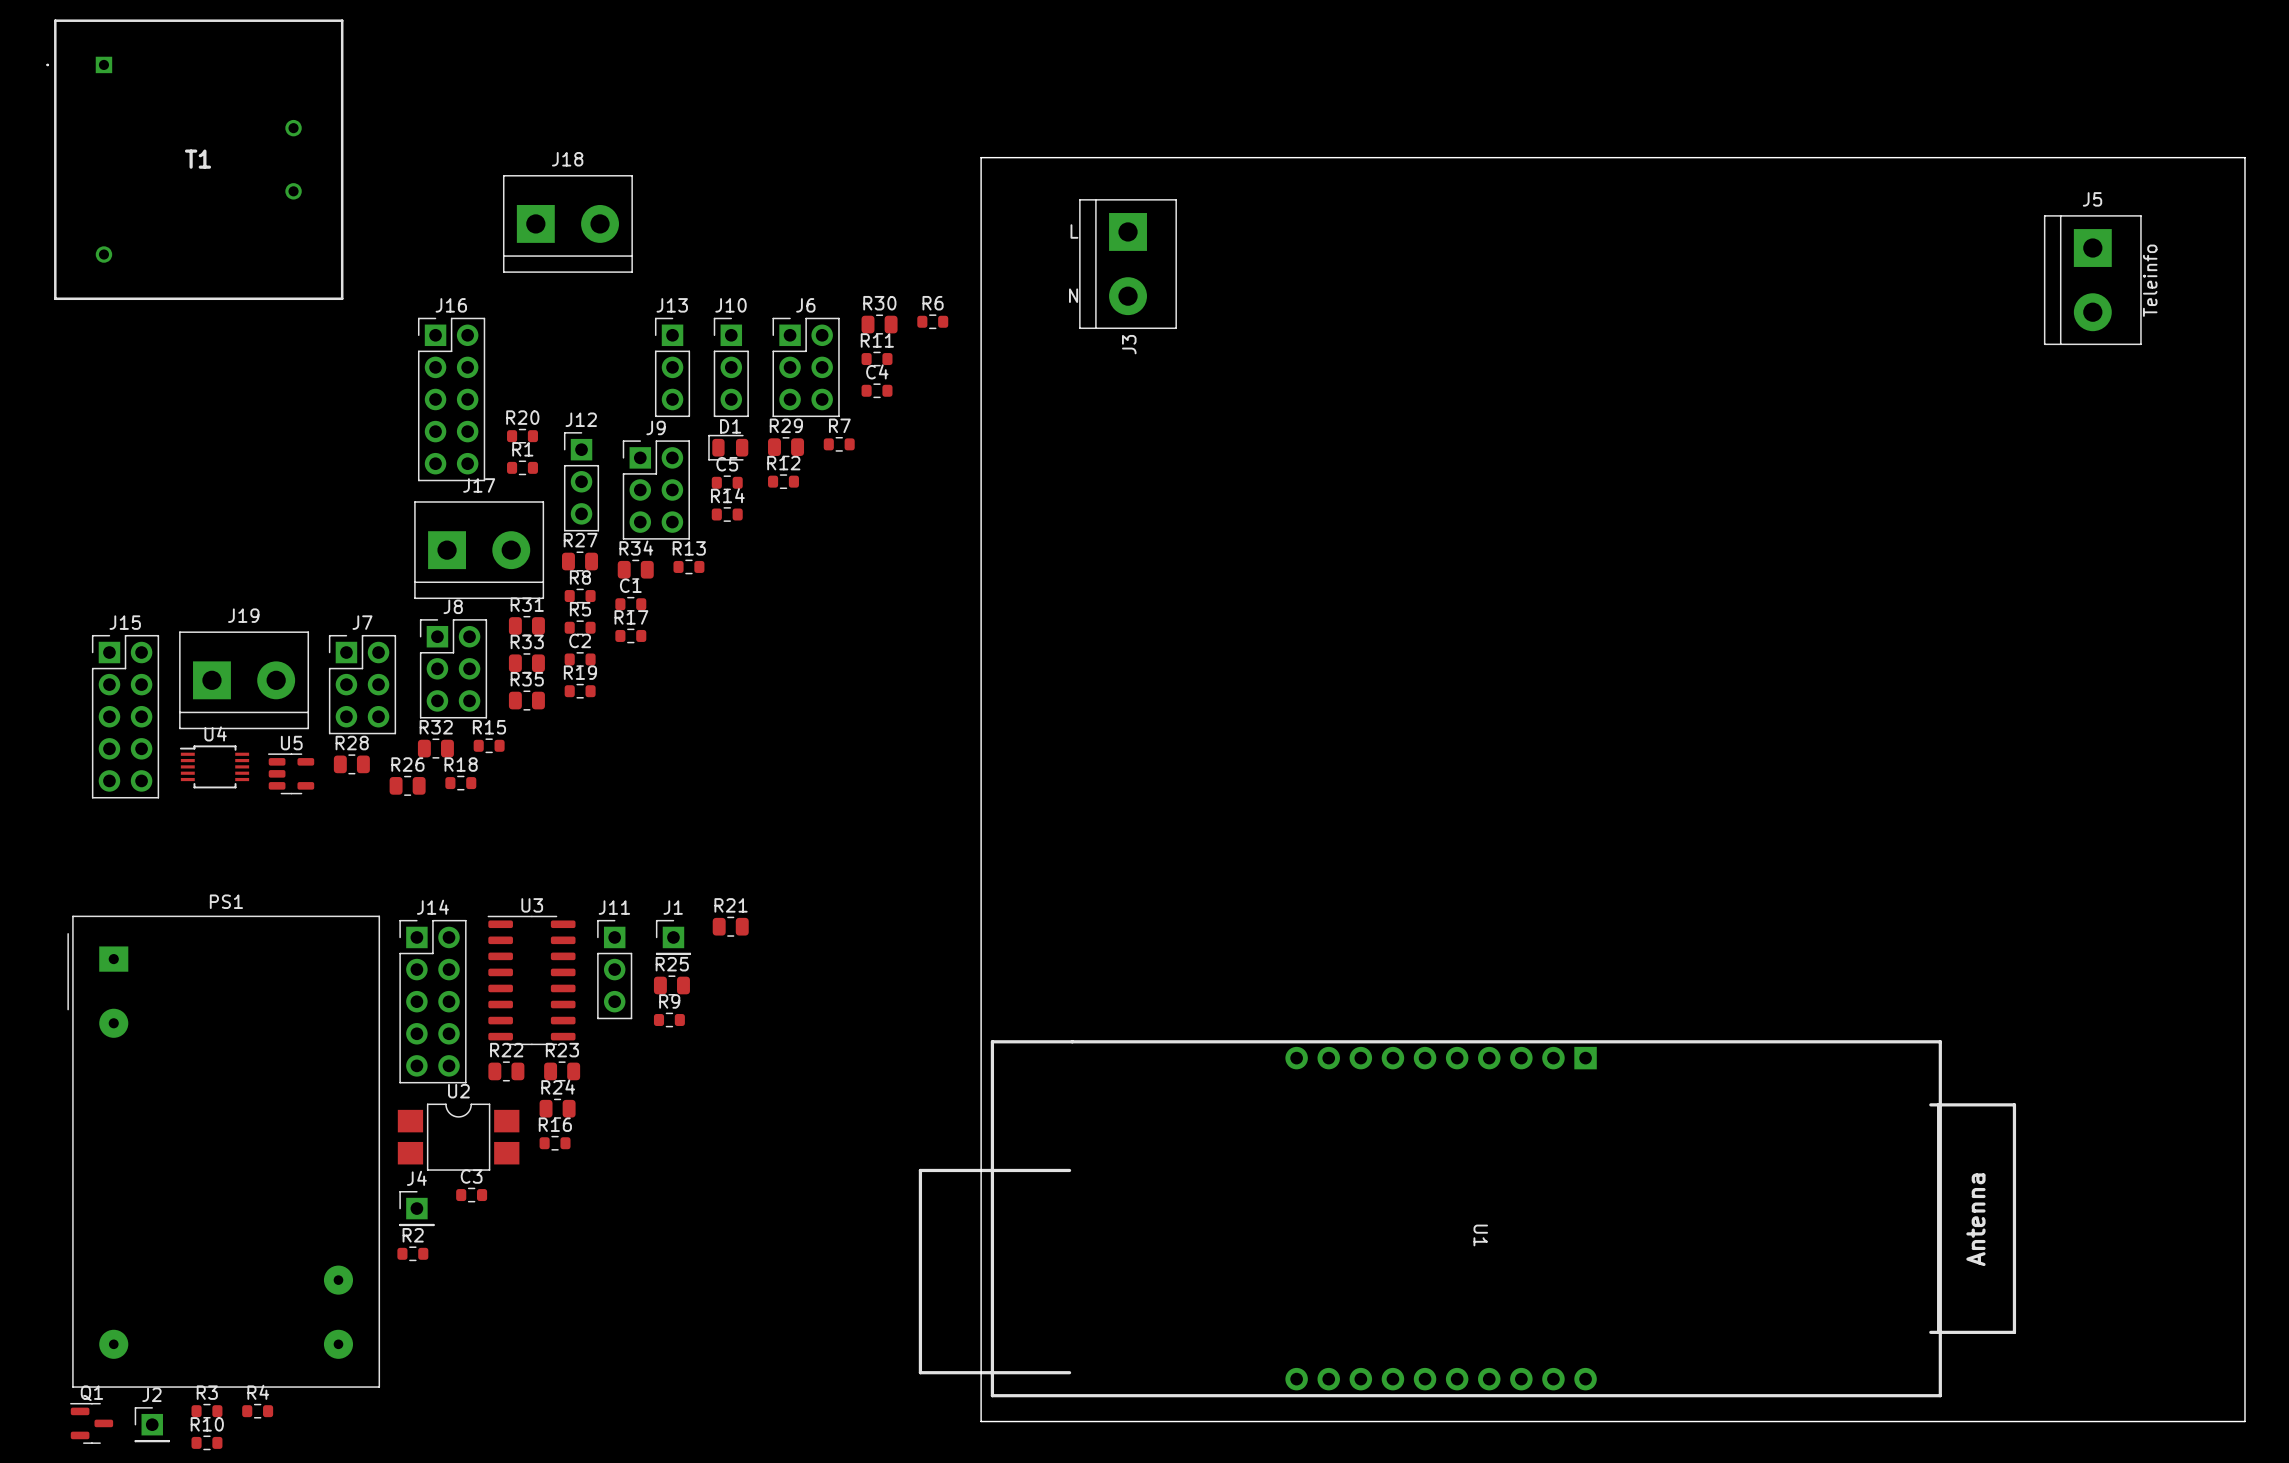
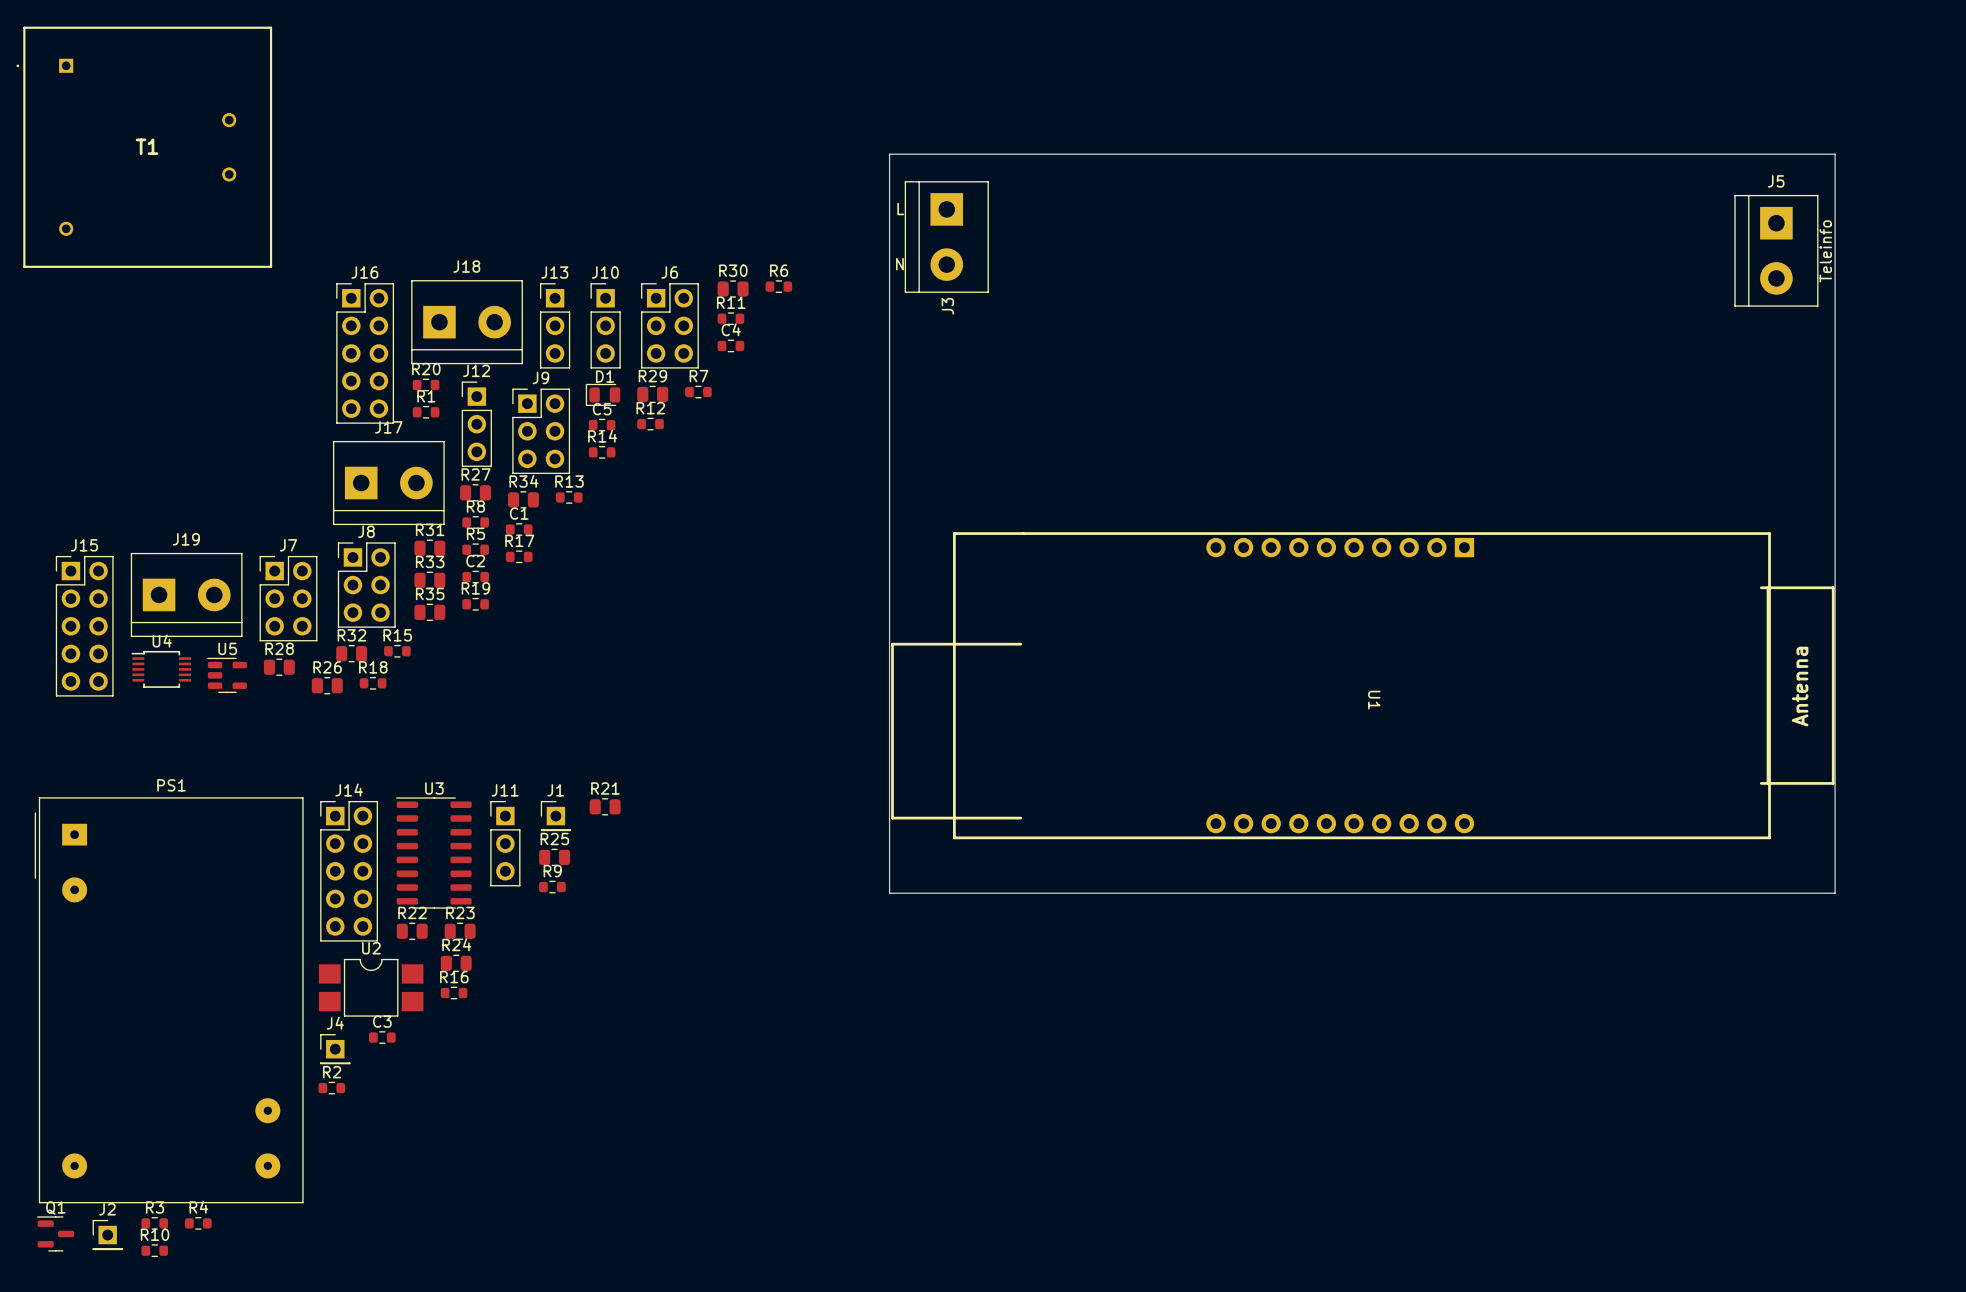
board edge: (981, 157) (2244, 157) (2244, 1421) (981, 1421) (981, 157) -> (889, 154) (889, 893) (1835, 893) (1835, 154) (889, 154)
J18 position: (567, 223) -> (467, 322)
U1 position: (1467, 1218) -> (1362, 685)

